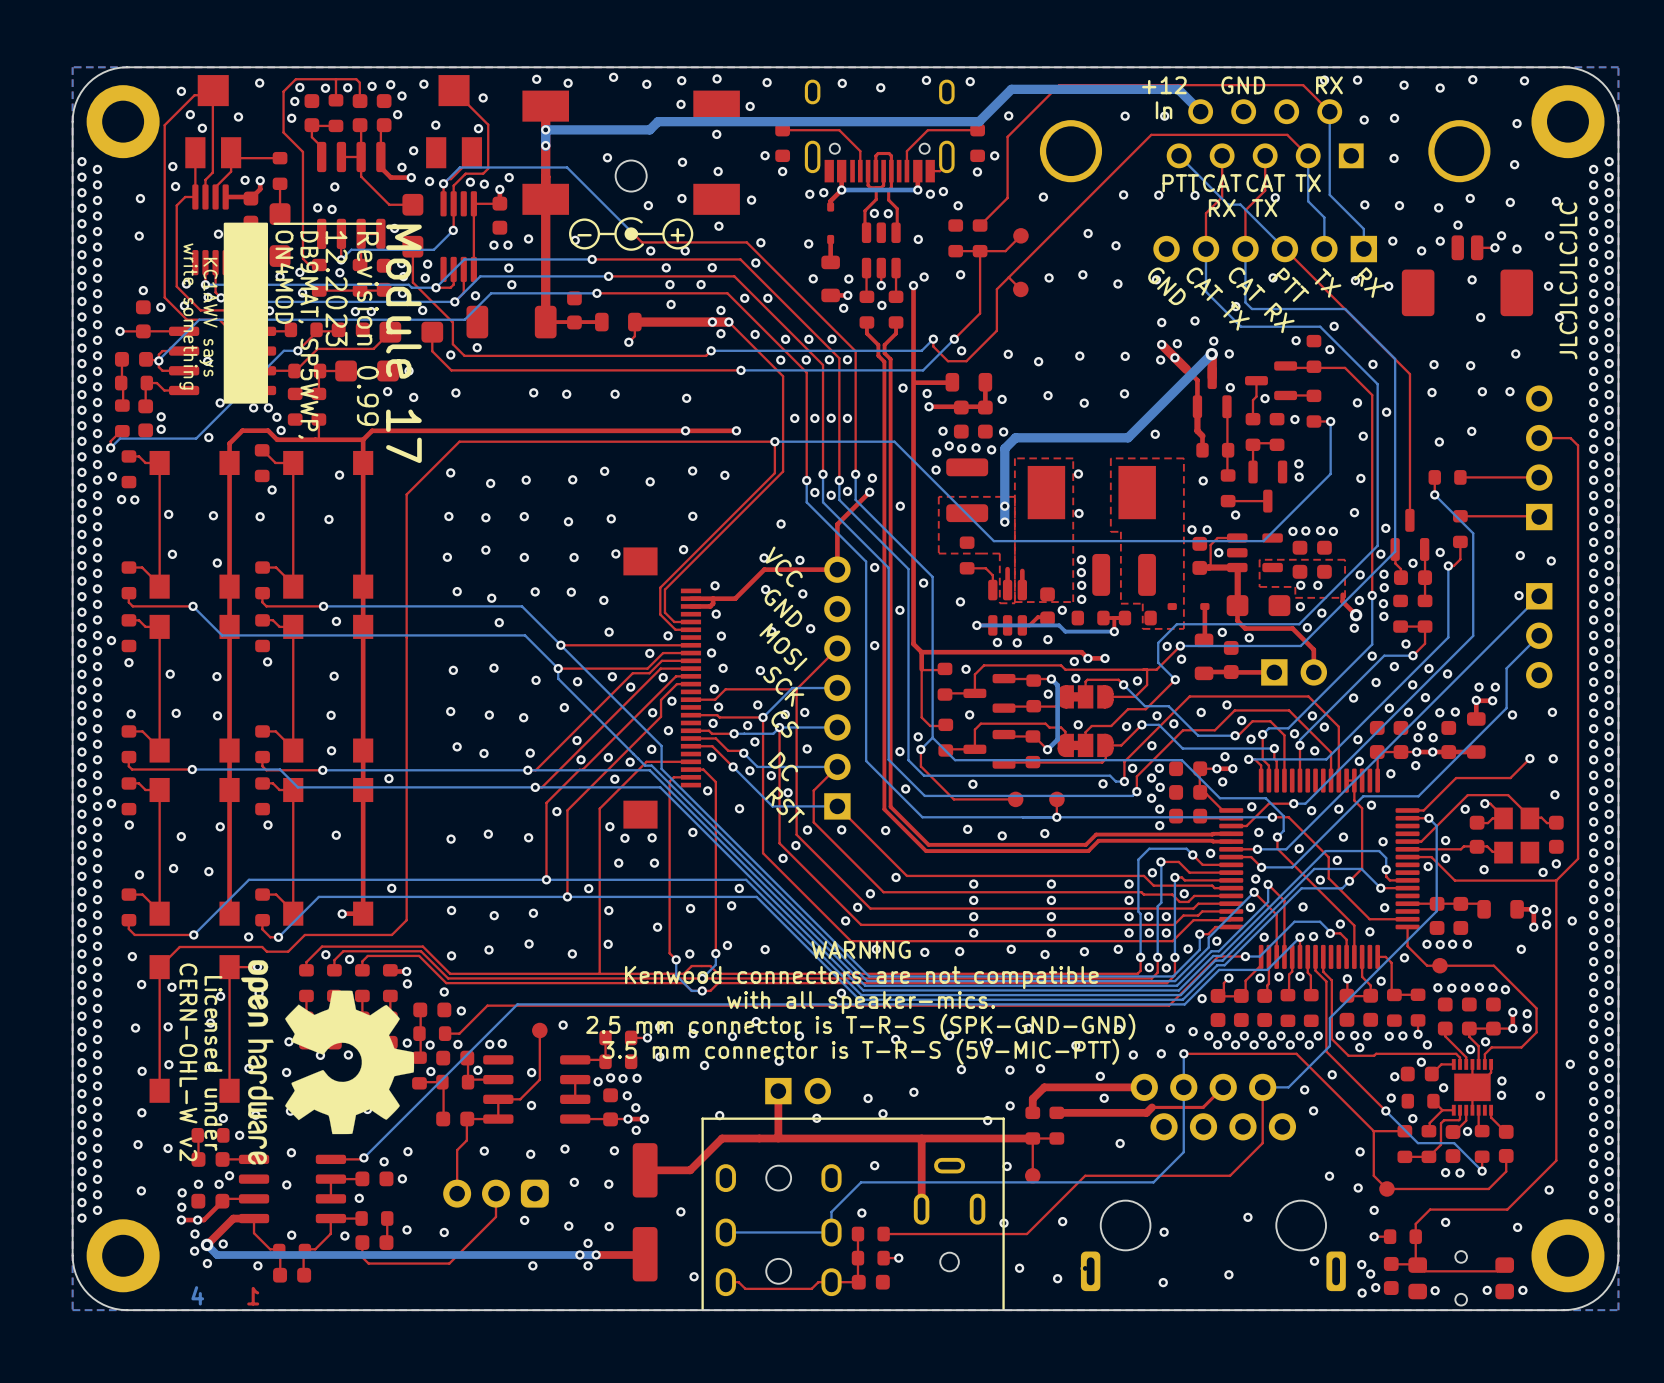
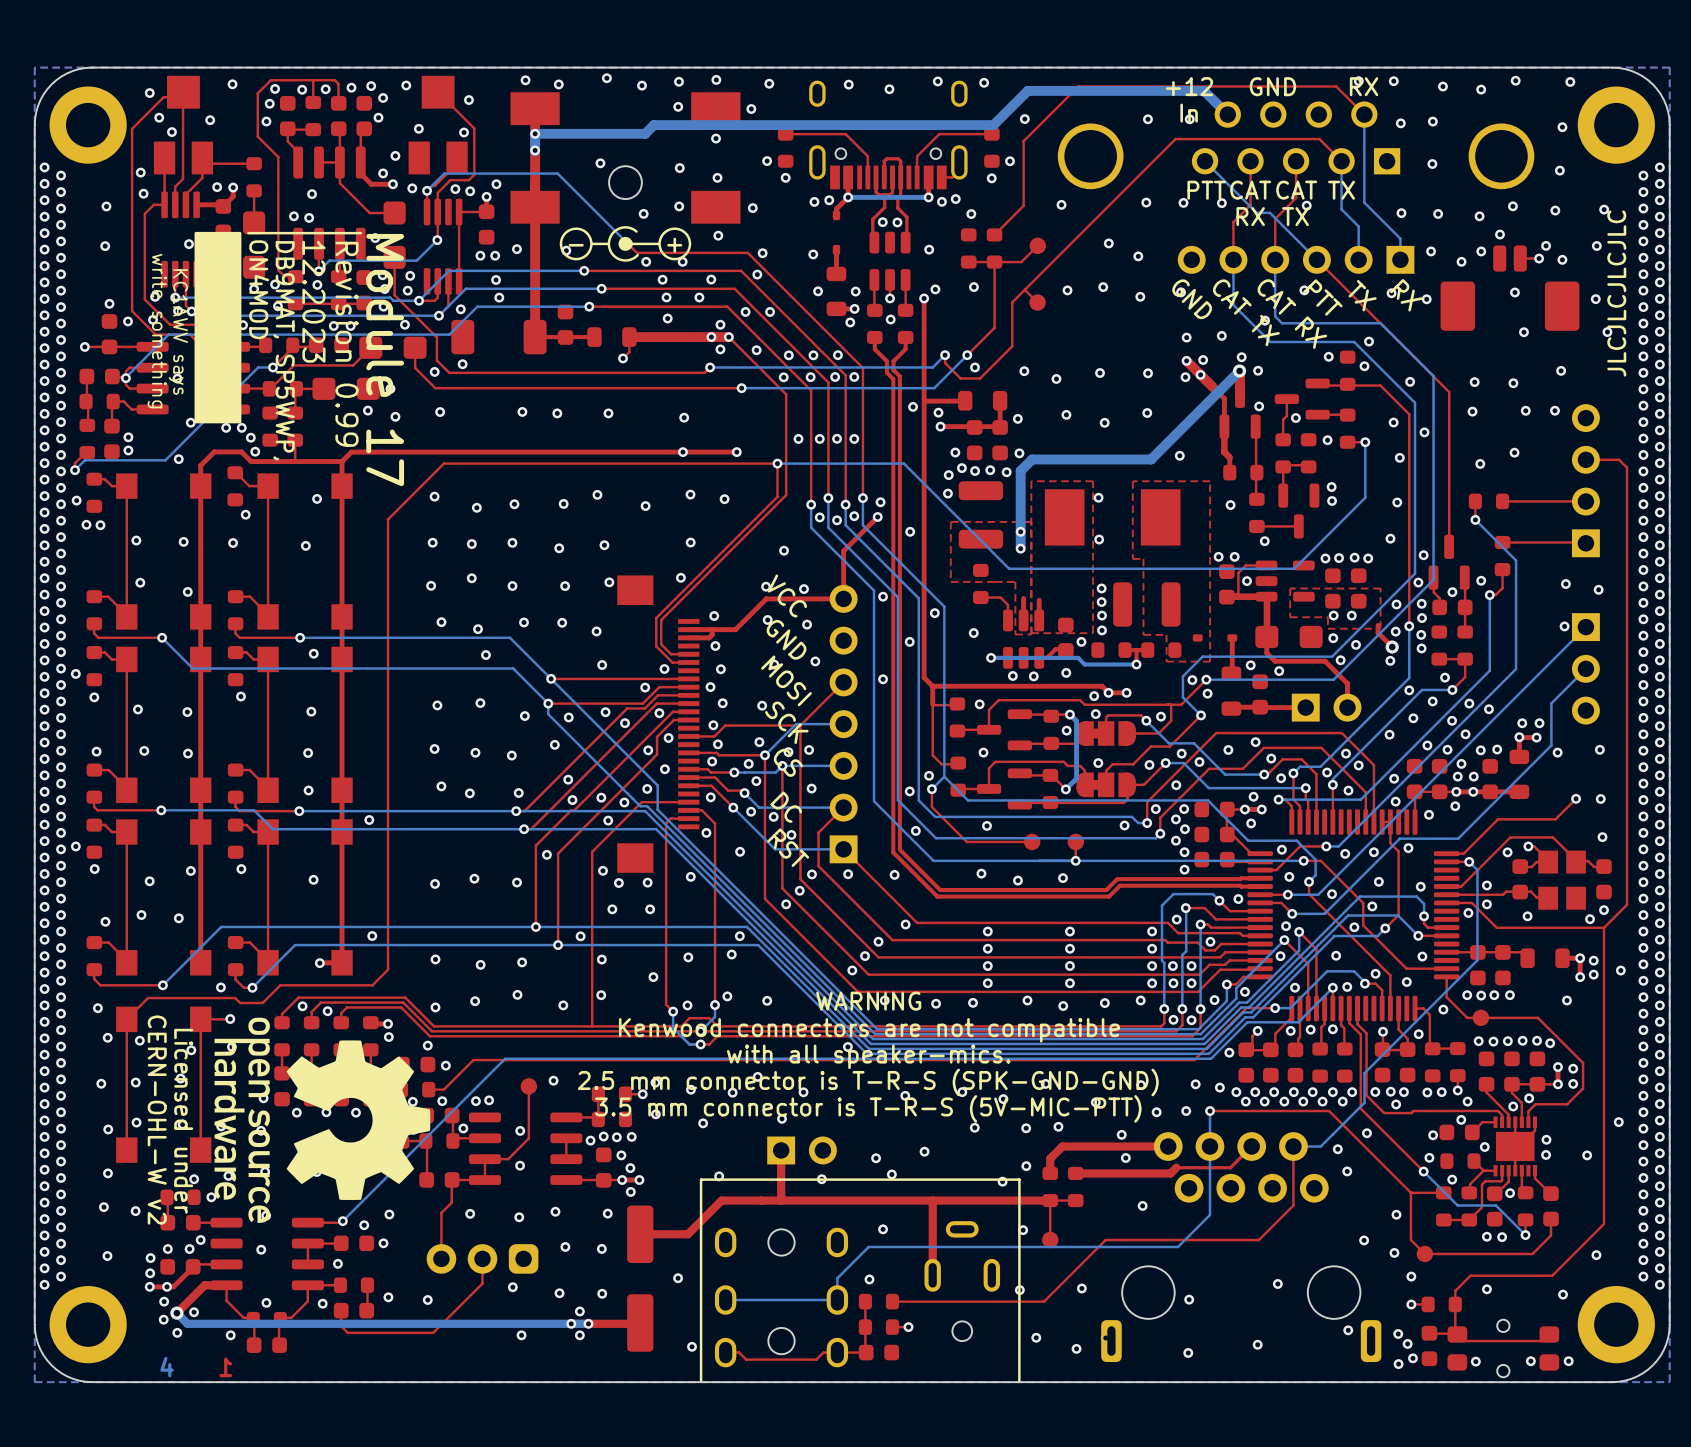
drawing: [241, 960, 415, 1165] -> none
drawing: none -> [214, 1017, 431, 1224]

